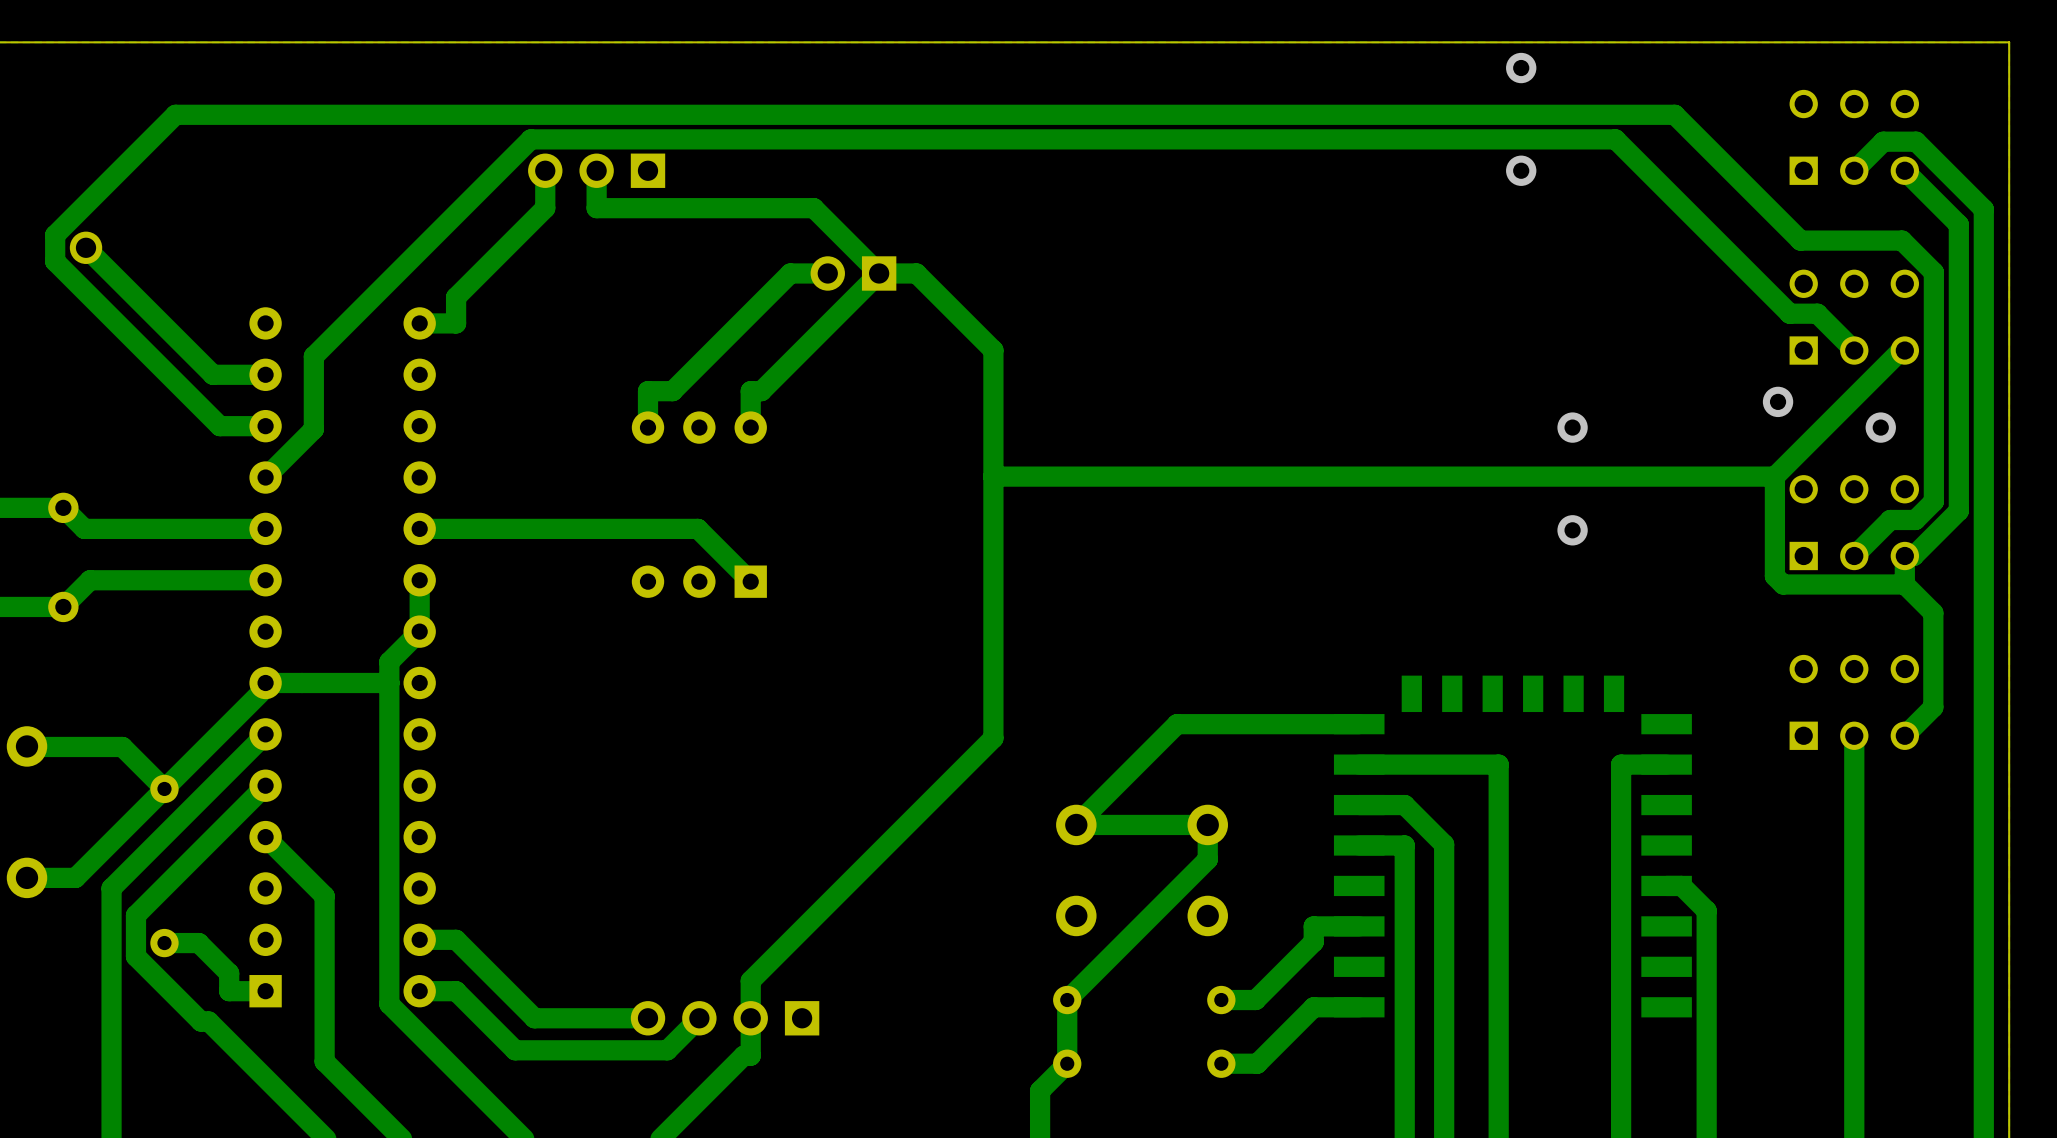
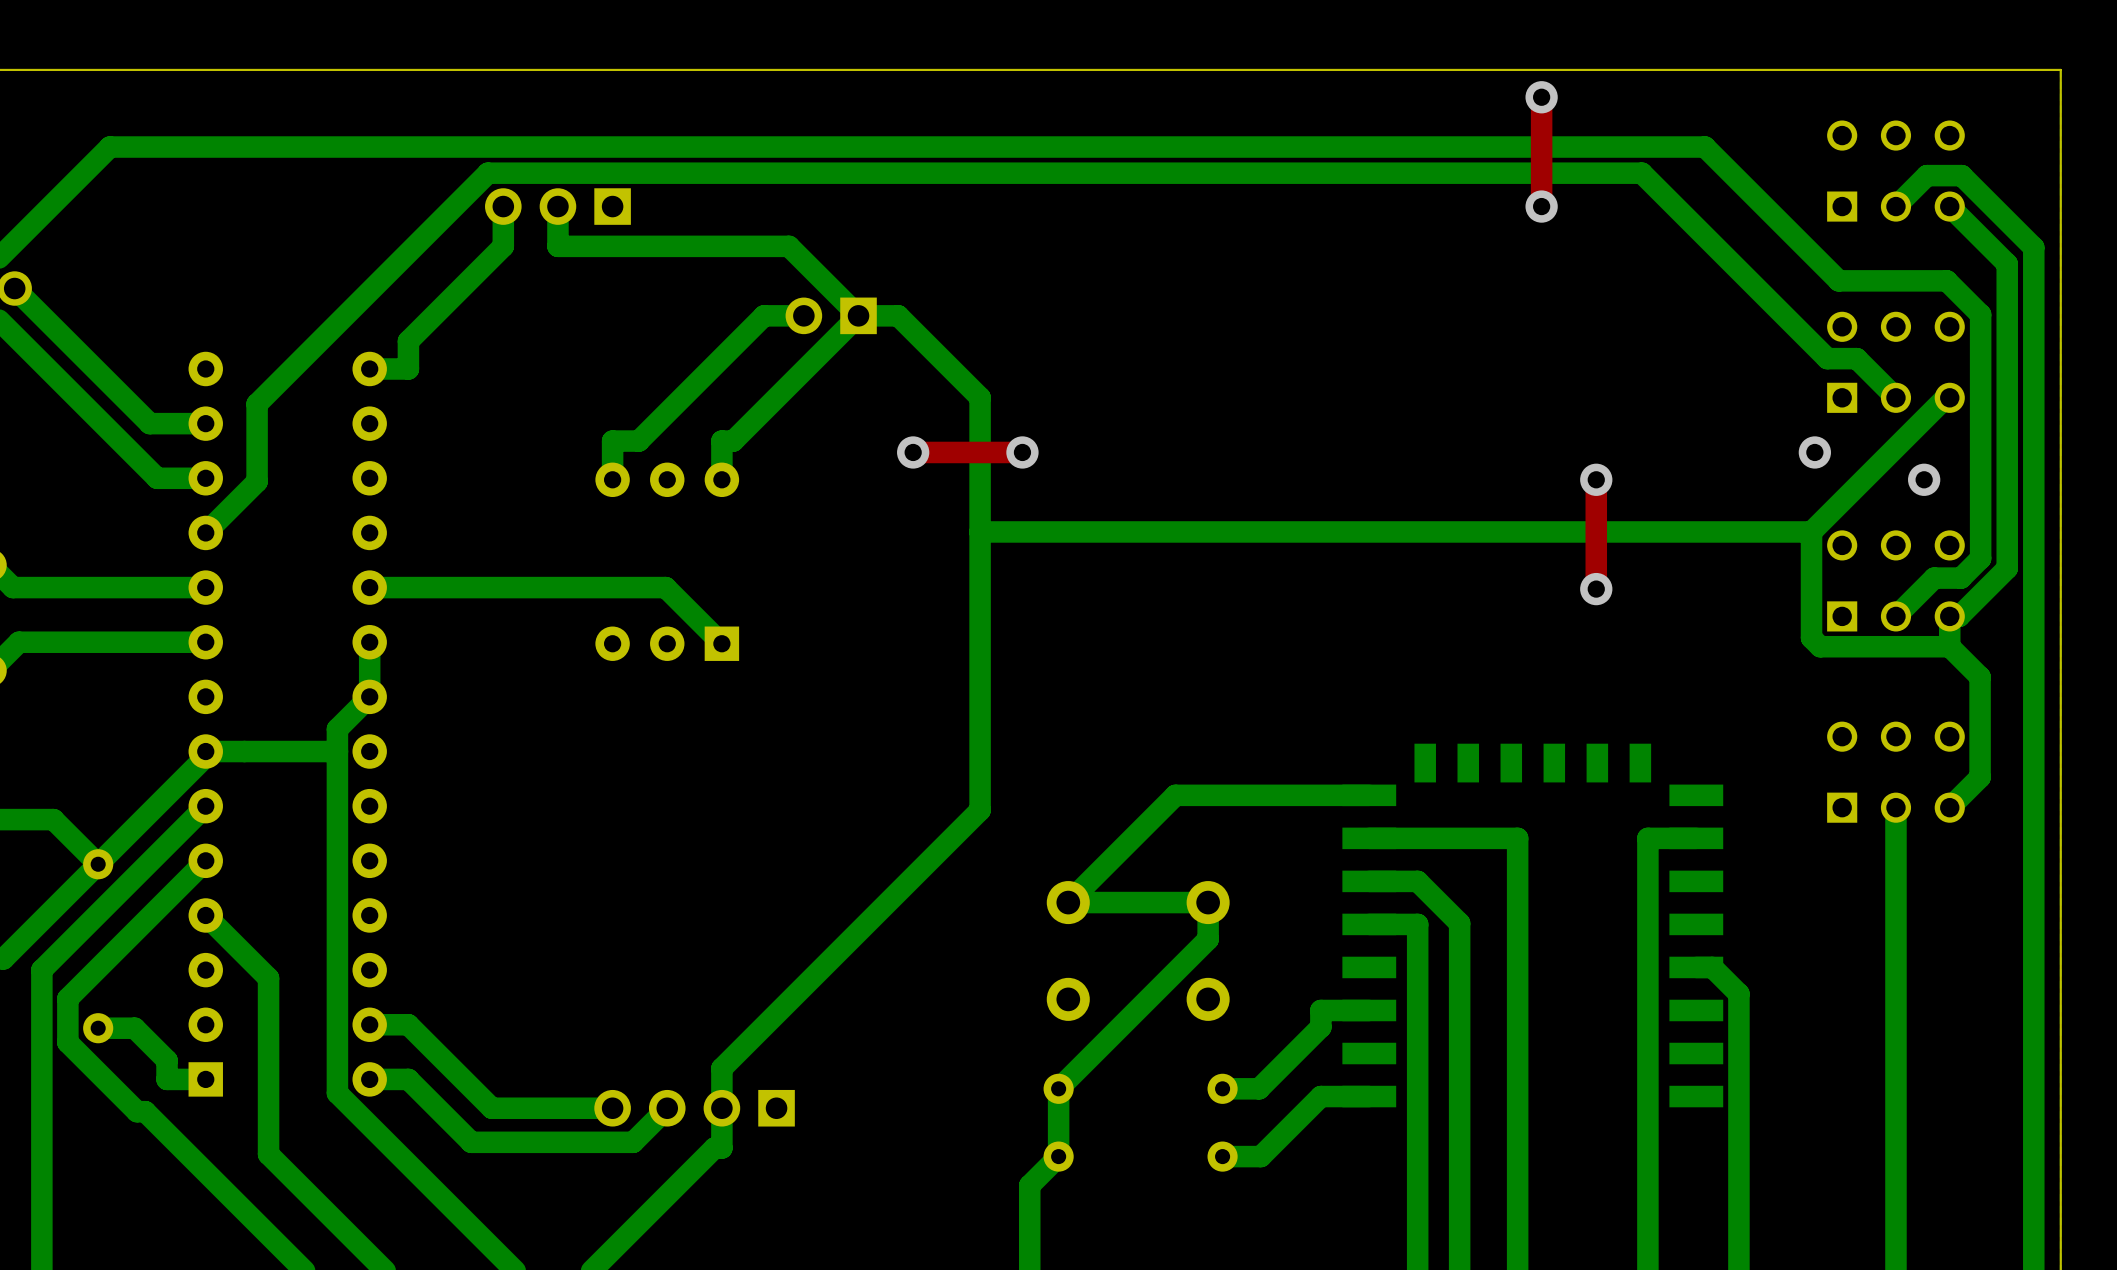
top track: none -> (1541, 97) (1541, 206)
top track: none -> (913, 452) (1022, 452)
via: none -> (913, 452)
via: none -> (1022, 452)
top track: none -> (1596, 479) (1596, 589)

